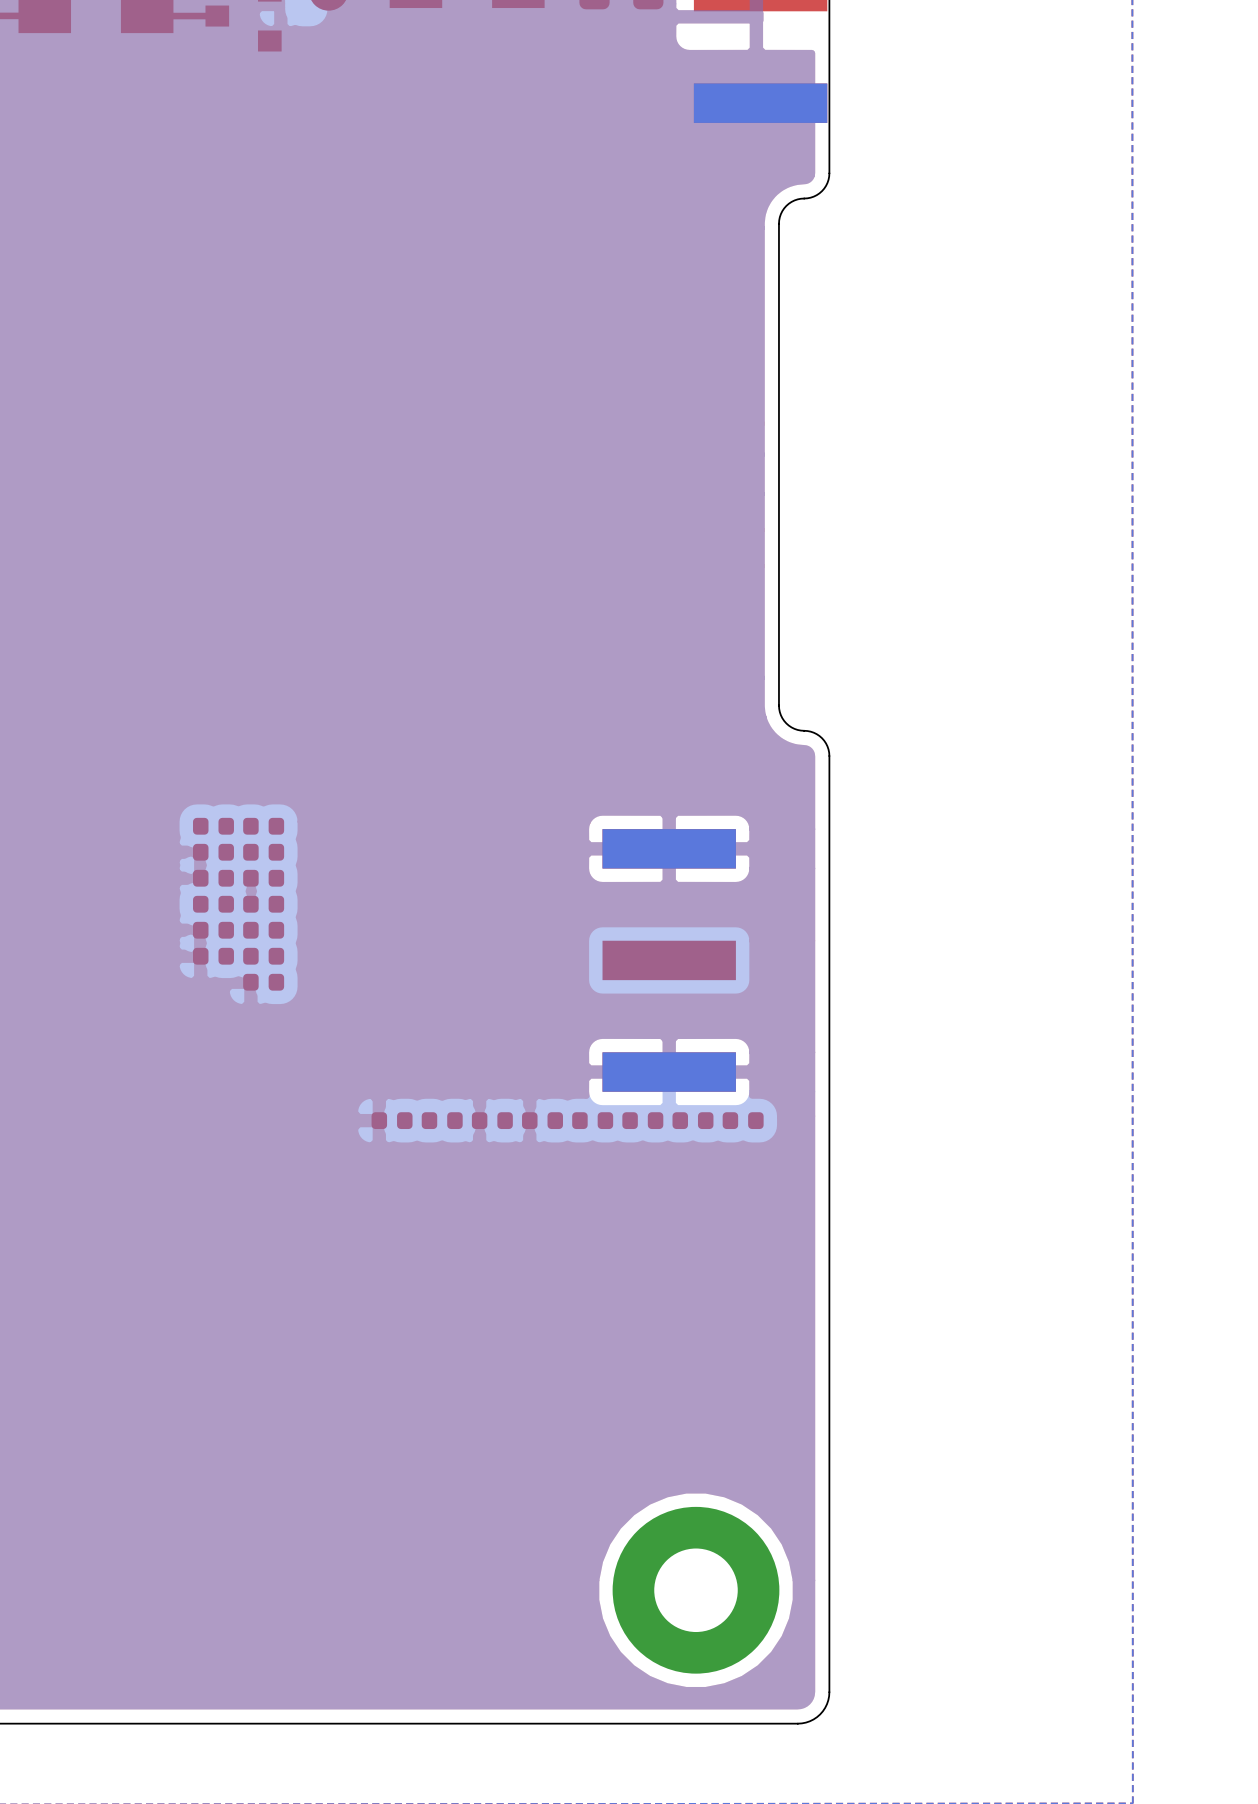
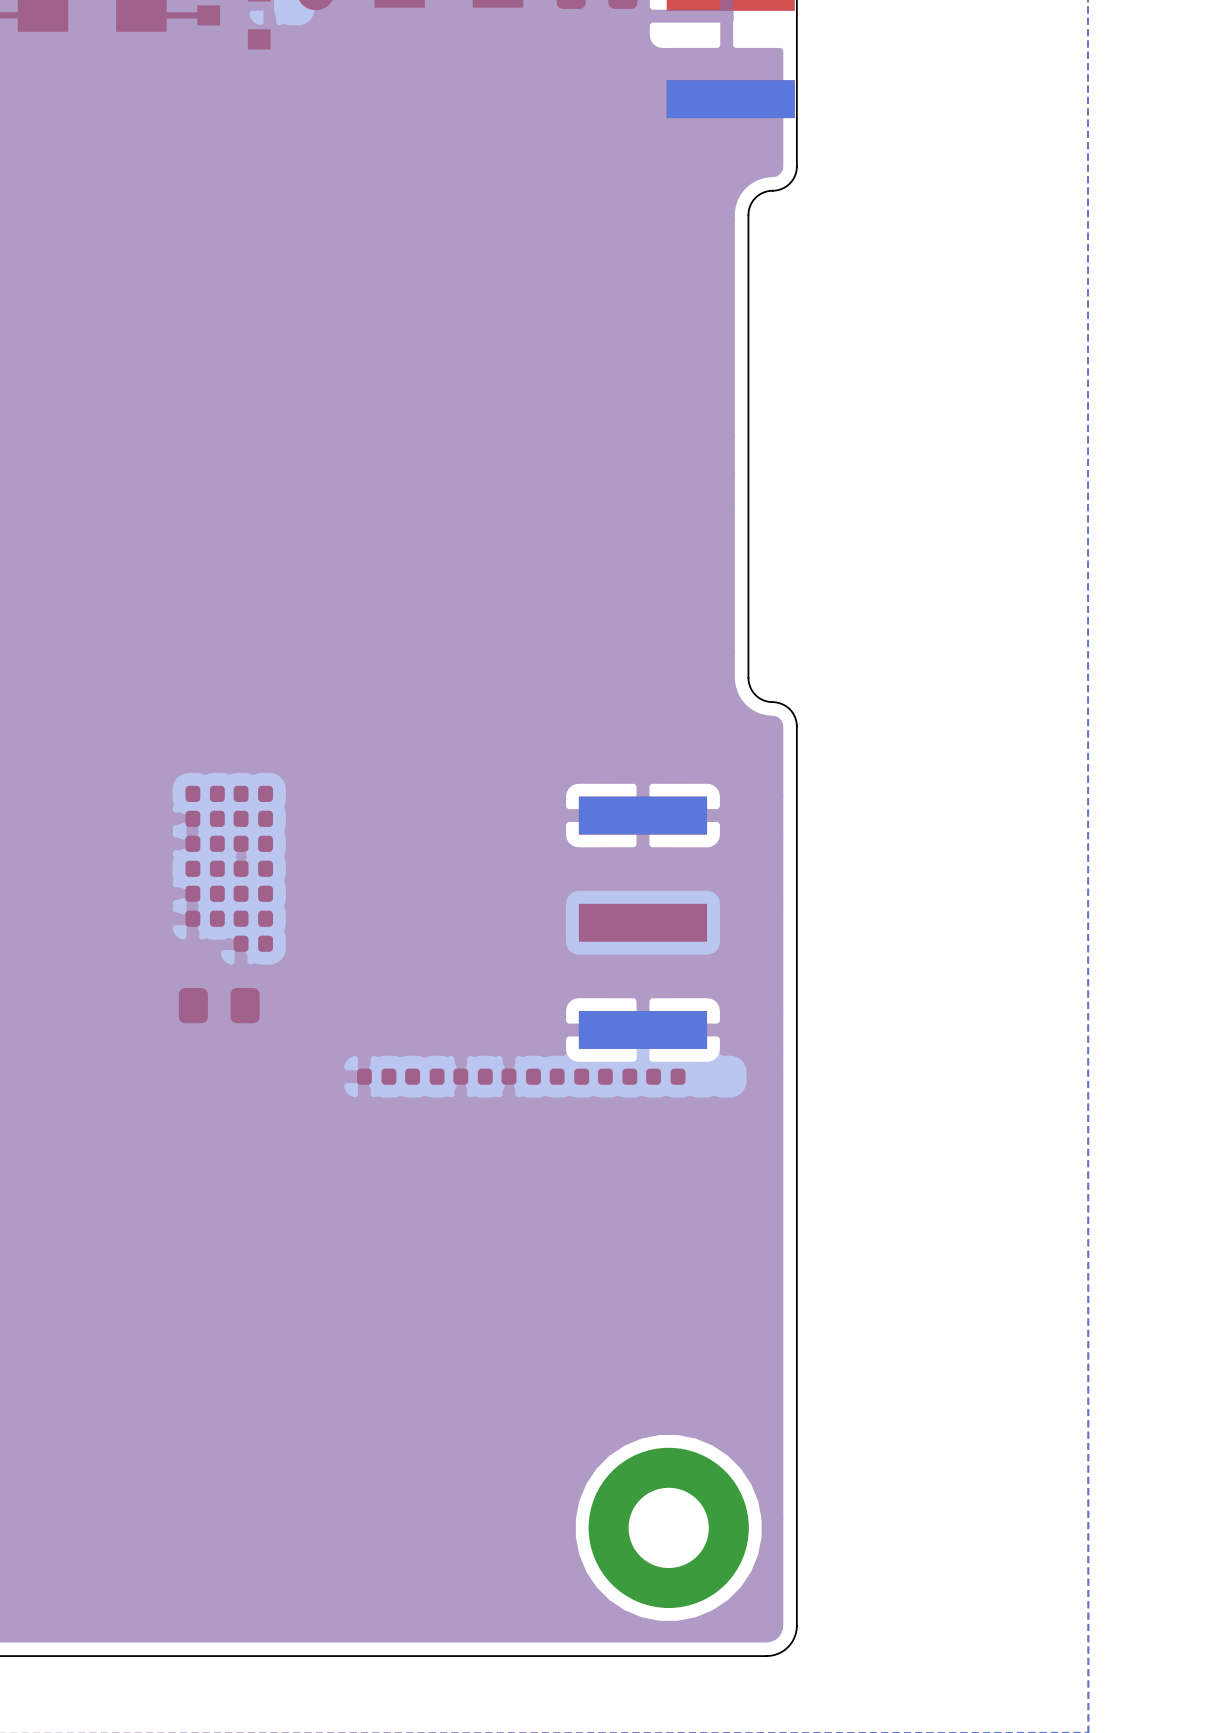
part: none -> (219, 1005)
part: (743, 1120) -> none

